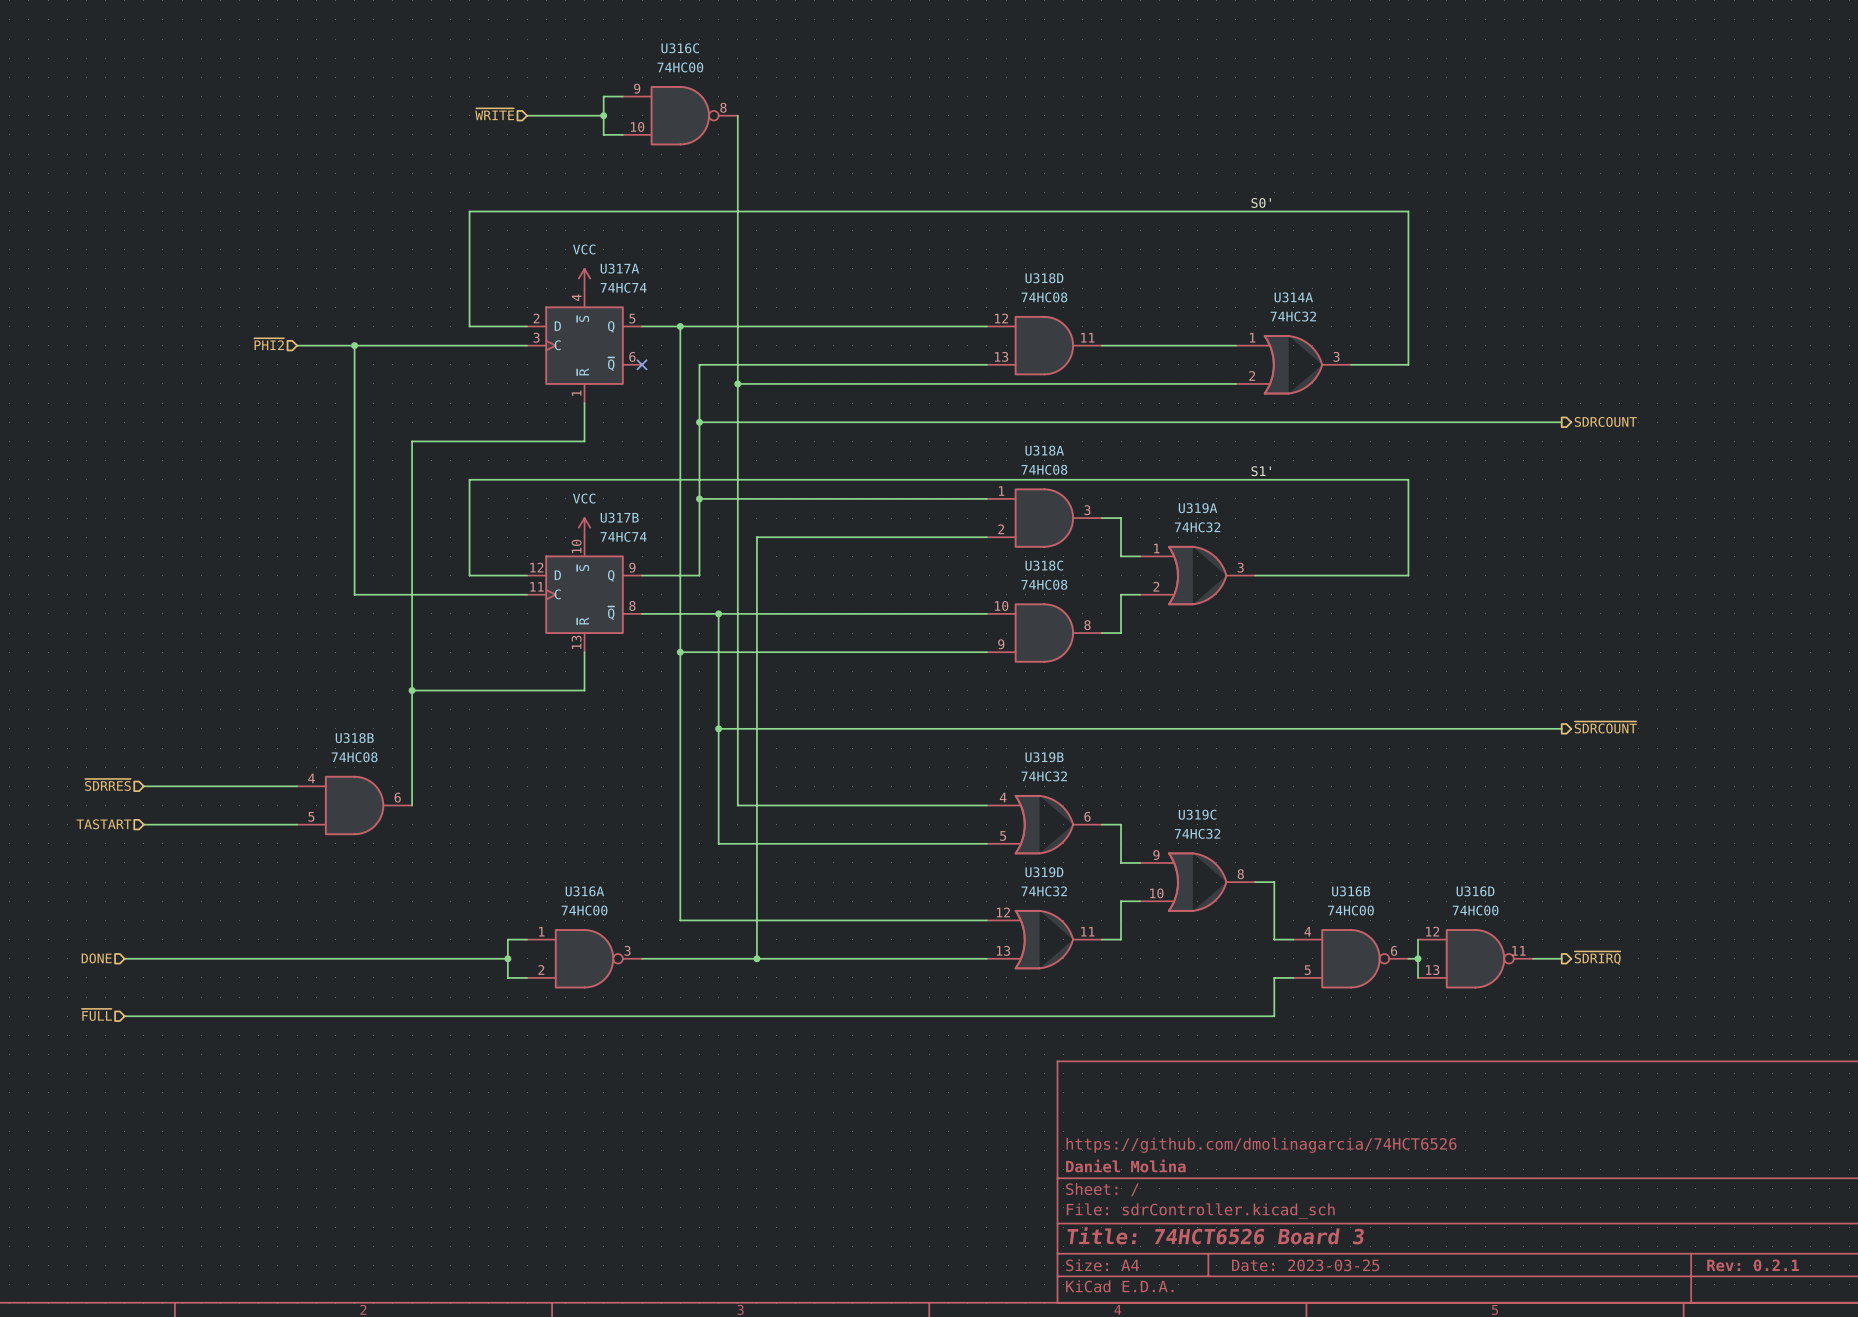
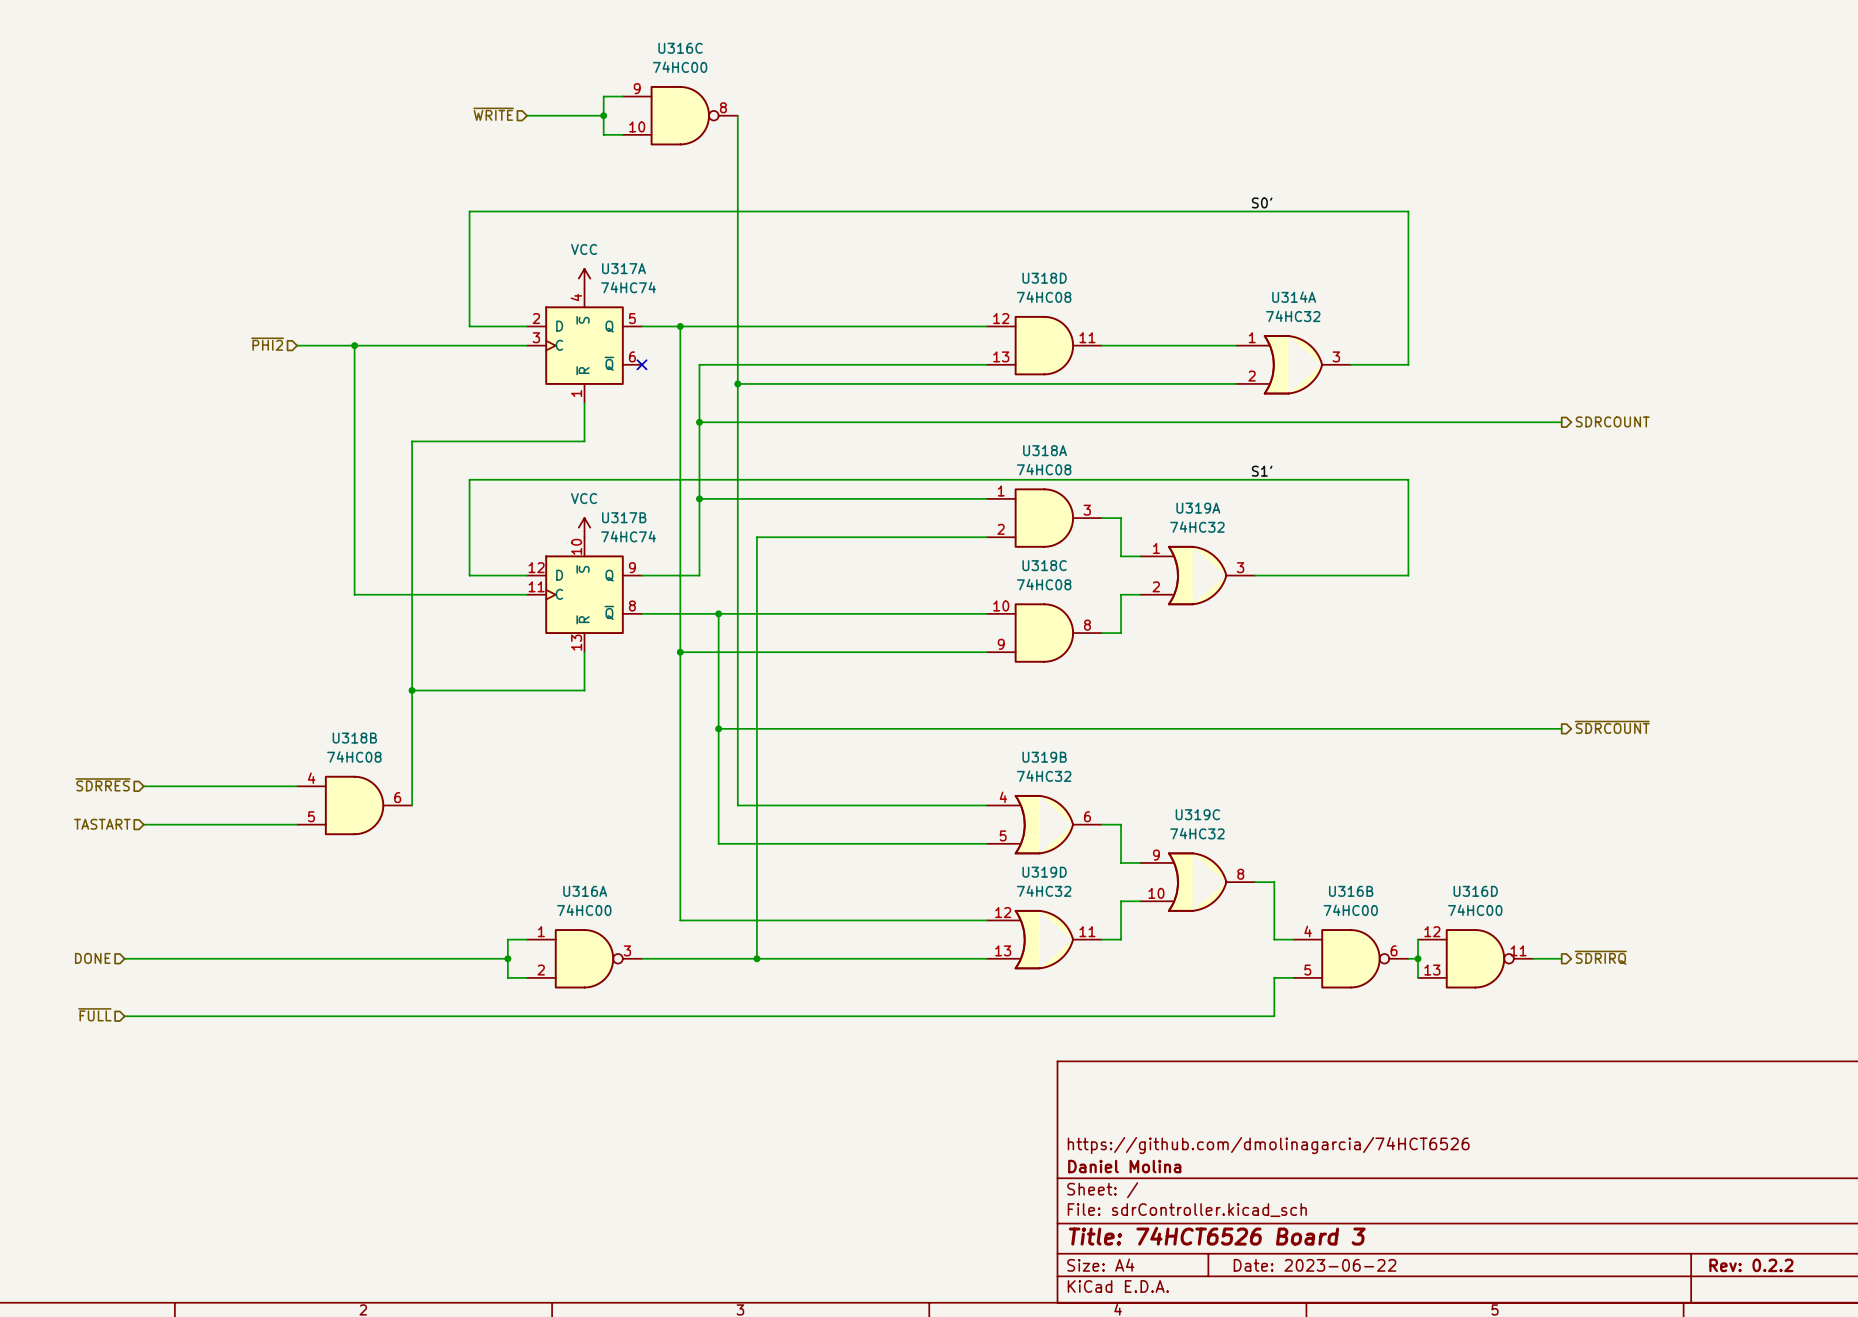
title block: Date: 2023-03-25 (1305, 1265) -> Date: 2023-06-22 (1315, 1265)
title block: Rev: 0.2.1 (1753, 1265) -> Rev: 0.2.2 (1751, 1265)

